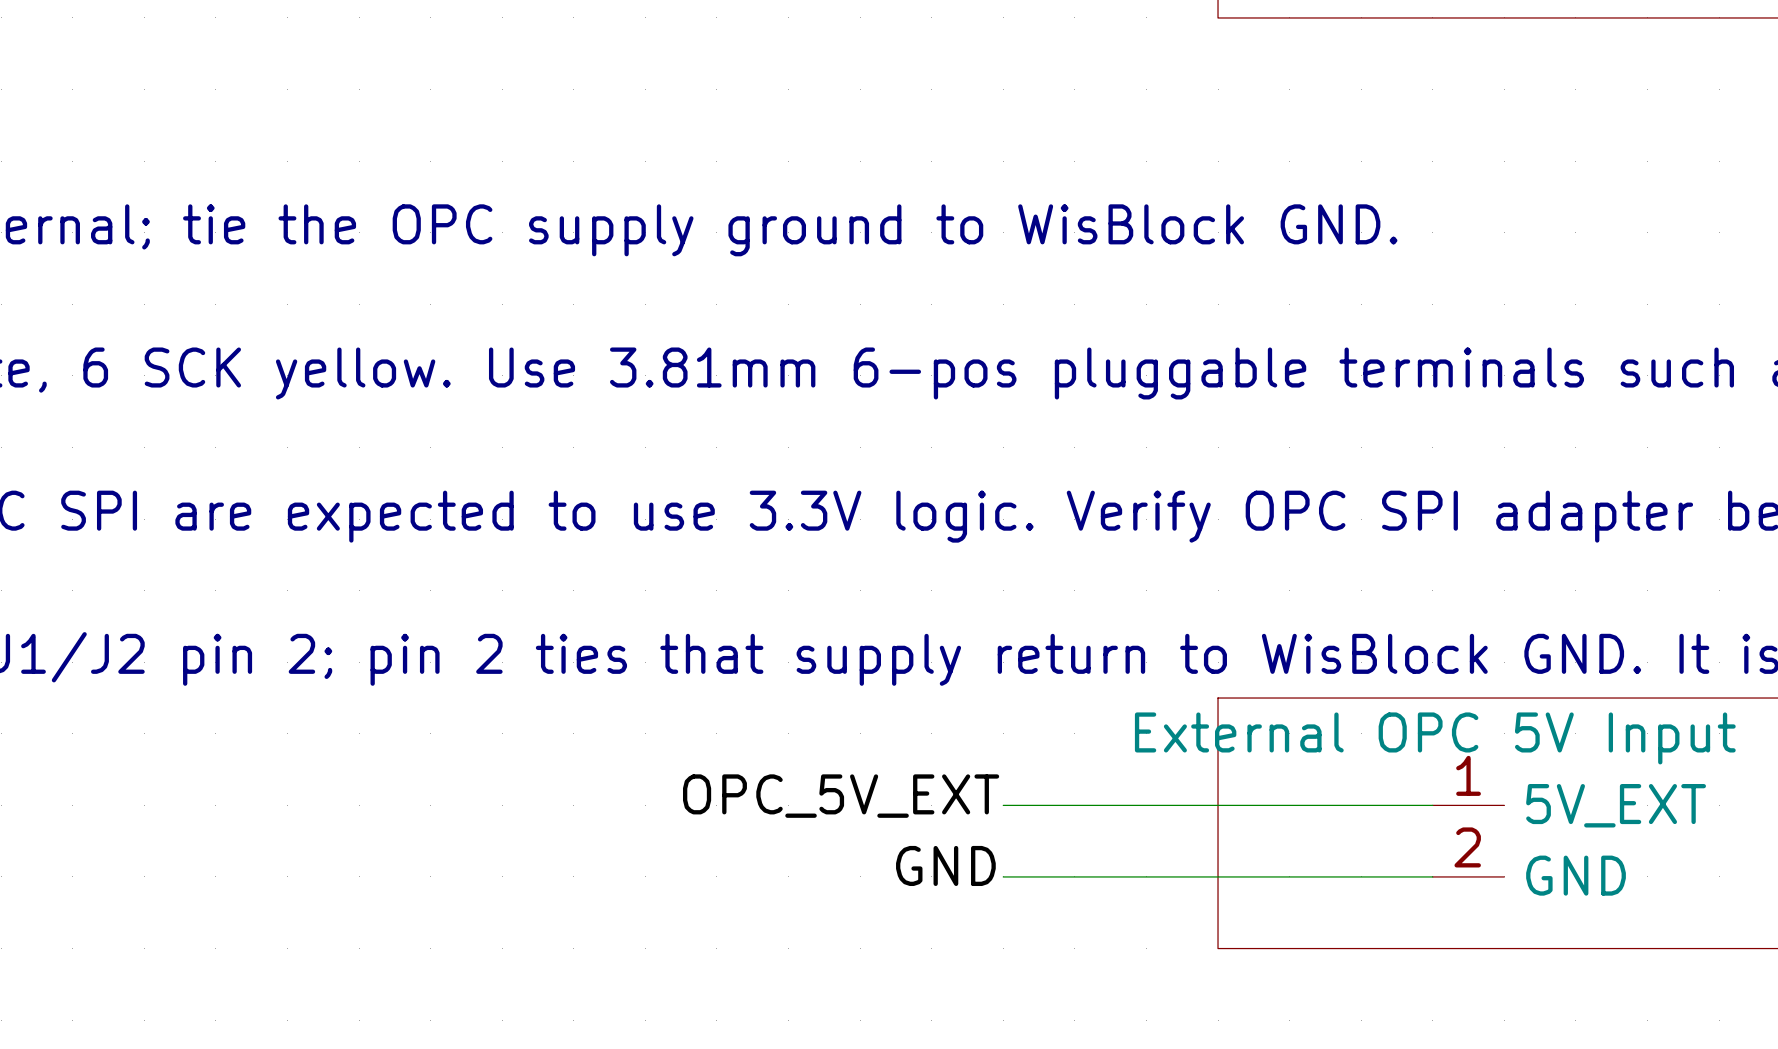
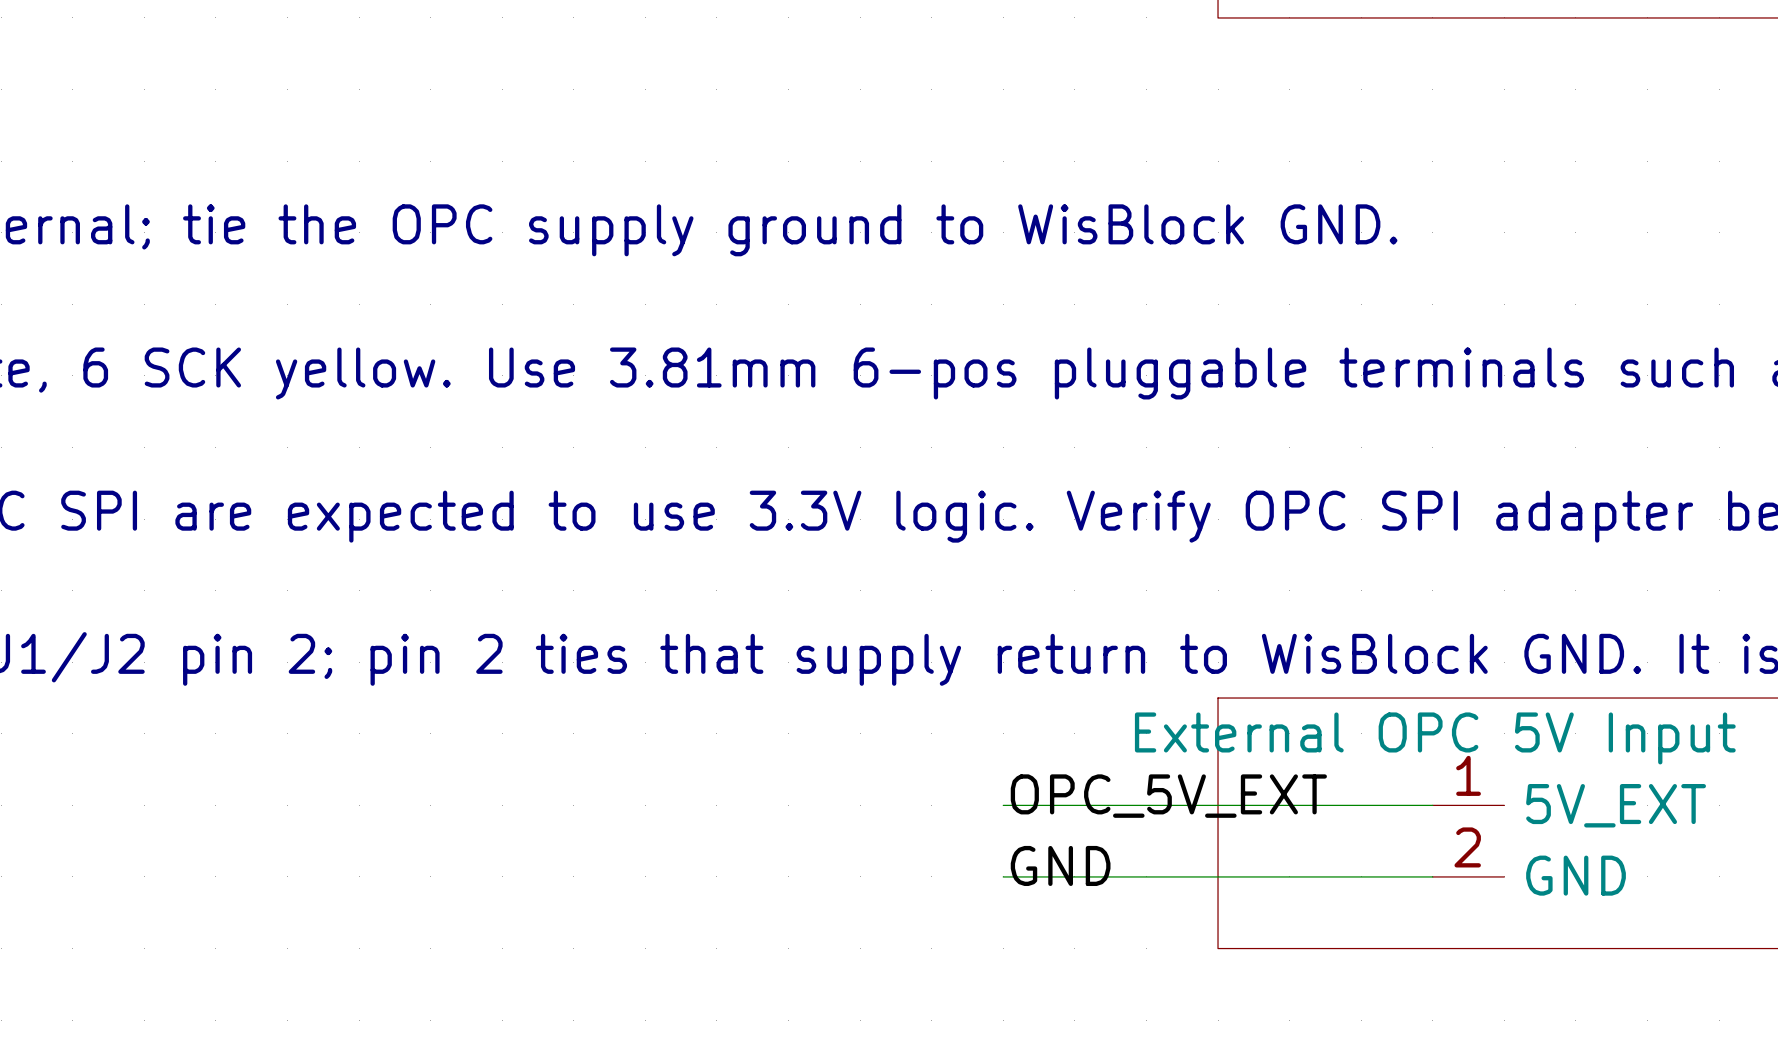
label position: OPC_5V_EXT (841, 796) -> OPC_5V_EXT (1168, 796)
label position: GND (945, 865) -> GND (1060, 865)

